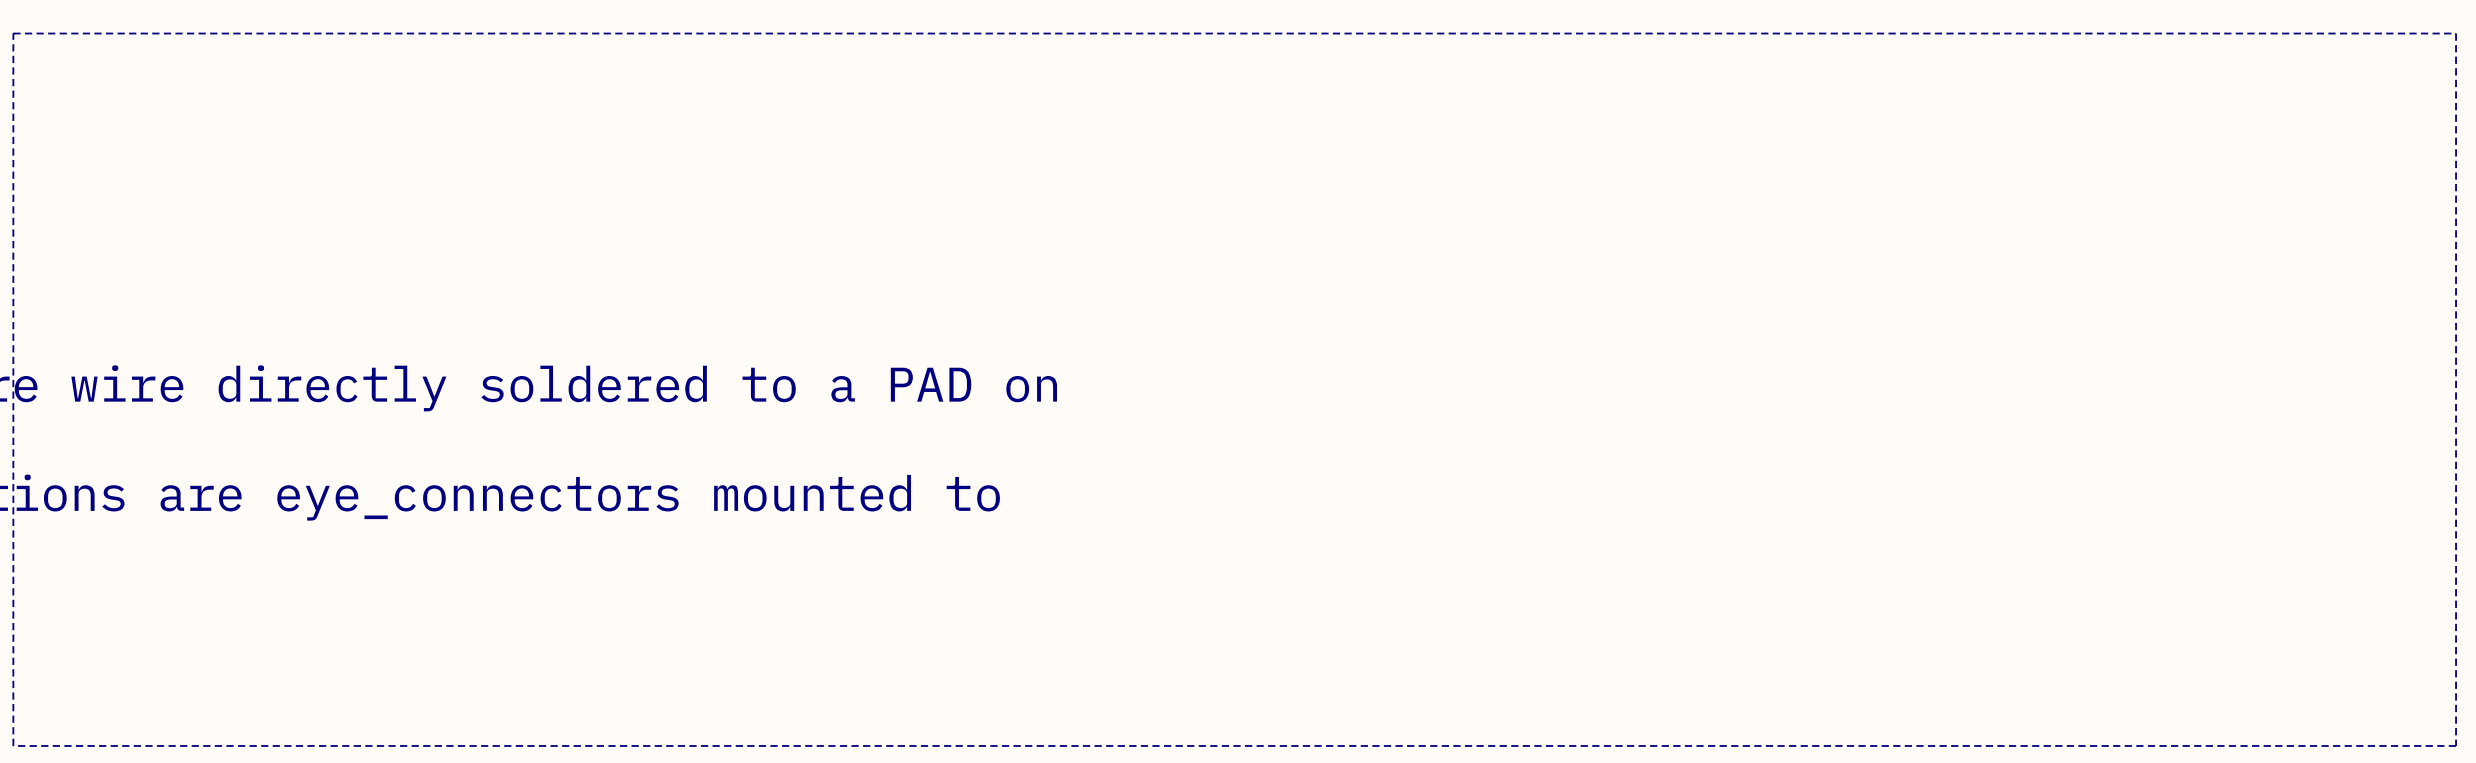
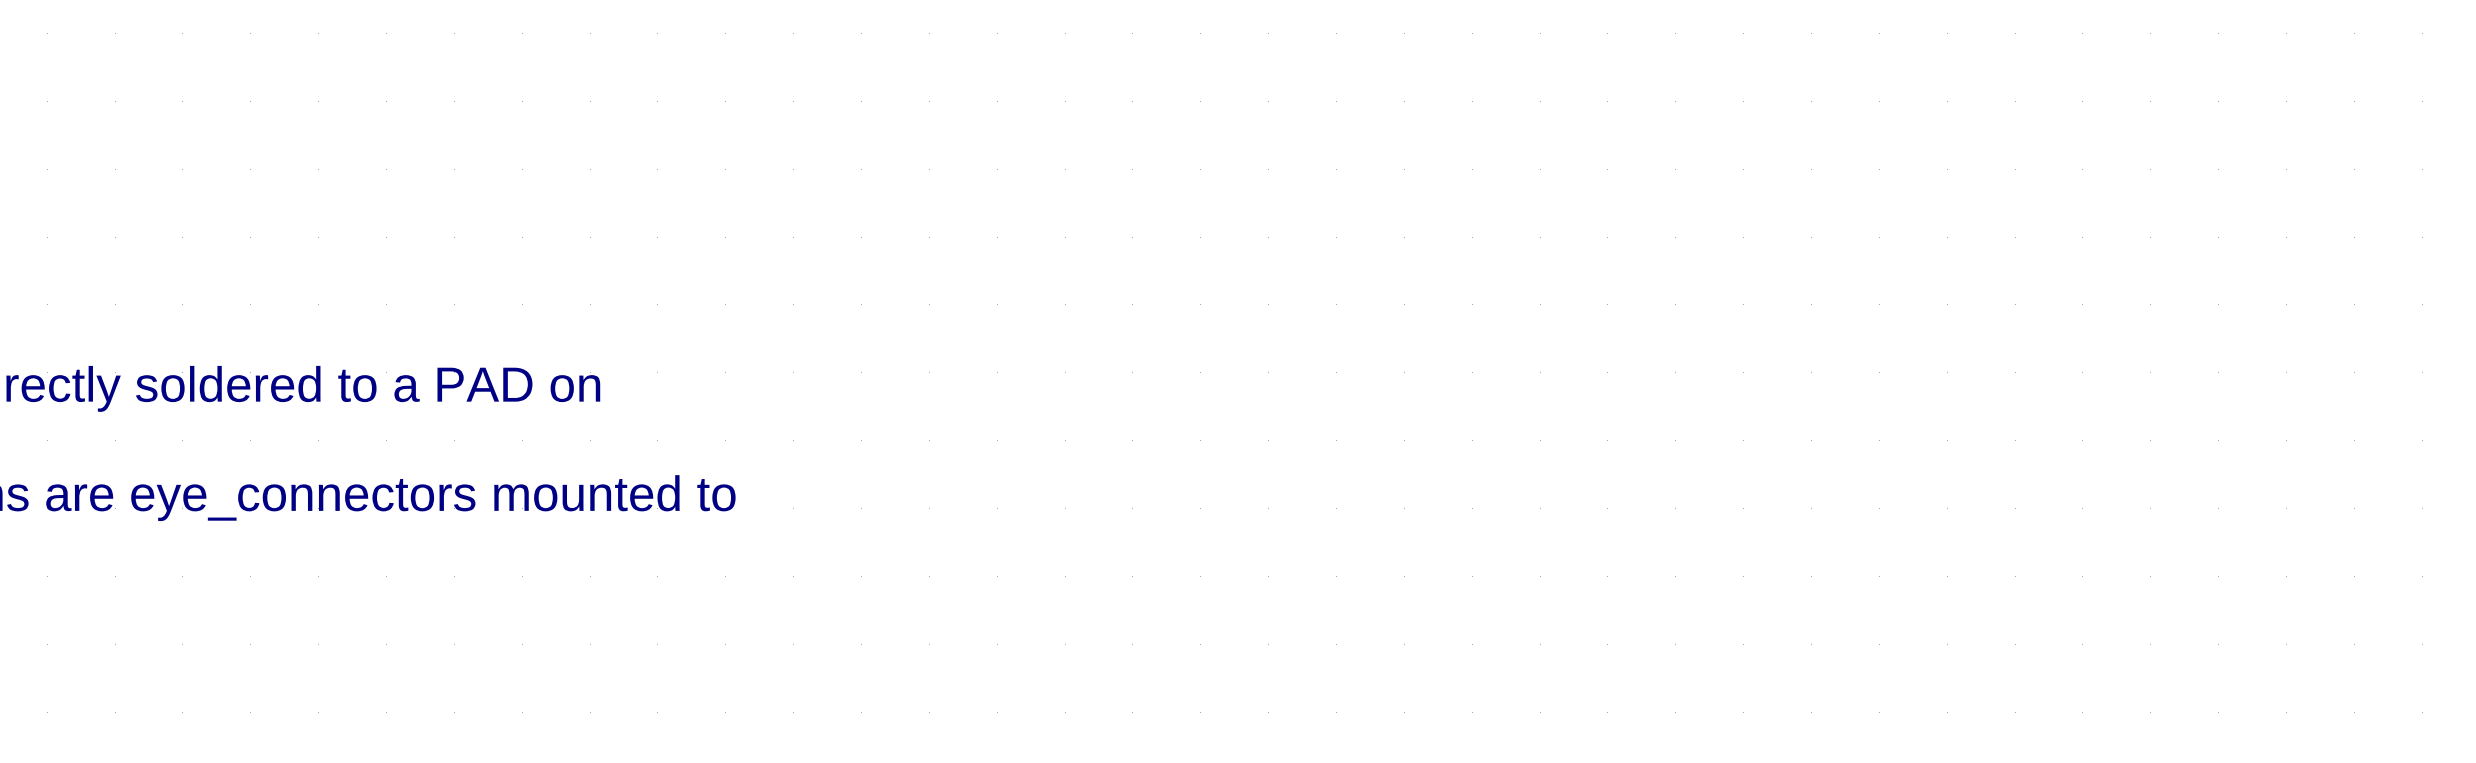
line: (13, 33) (2456, 33) (2456, 745) (13, 745) (13, 33) -> none

